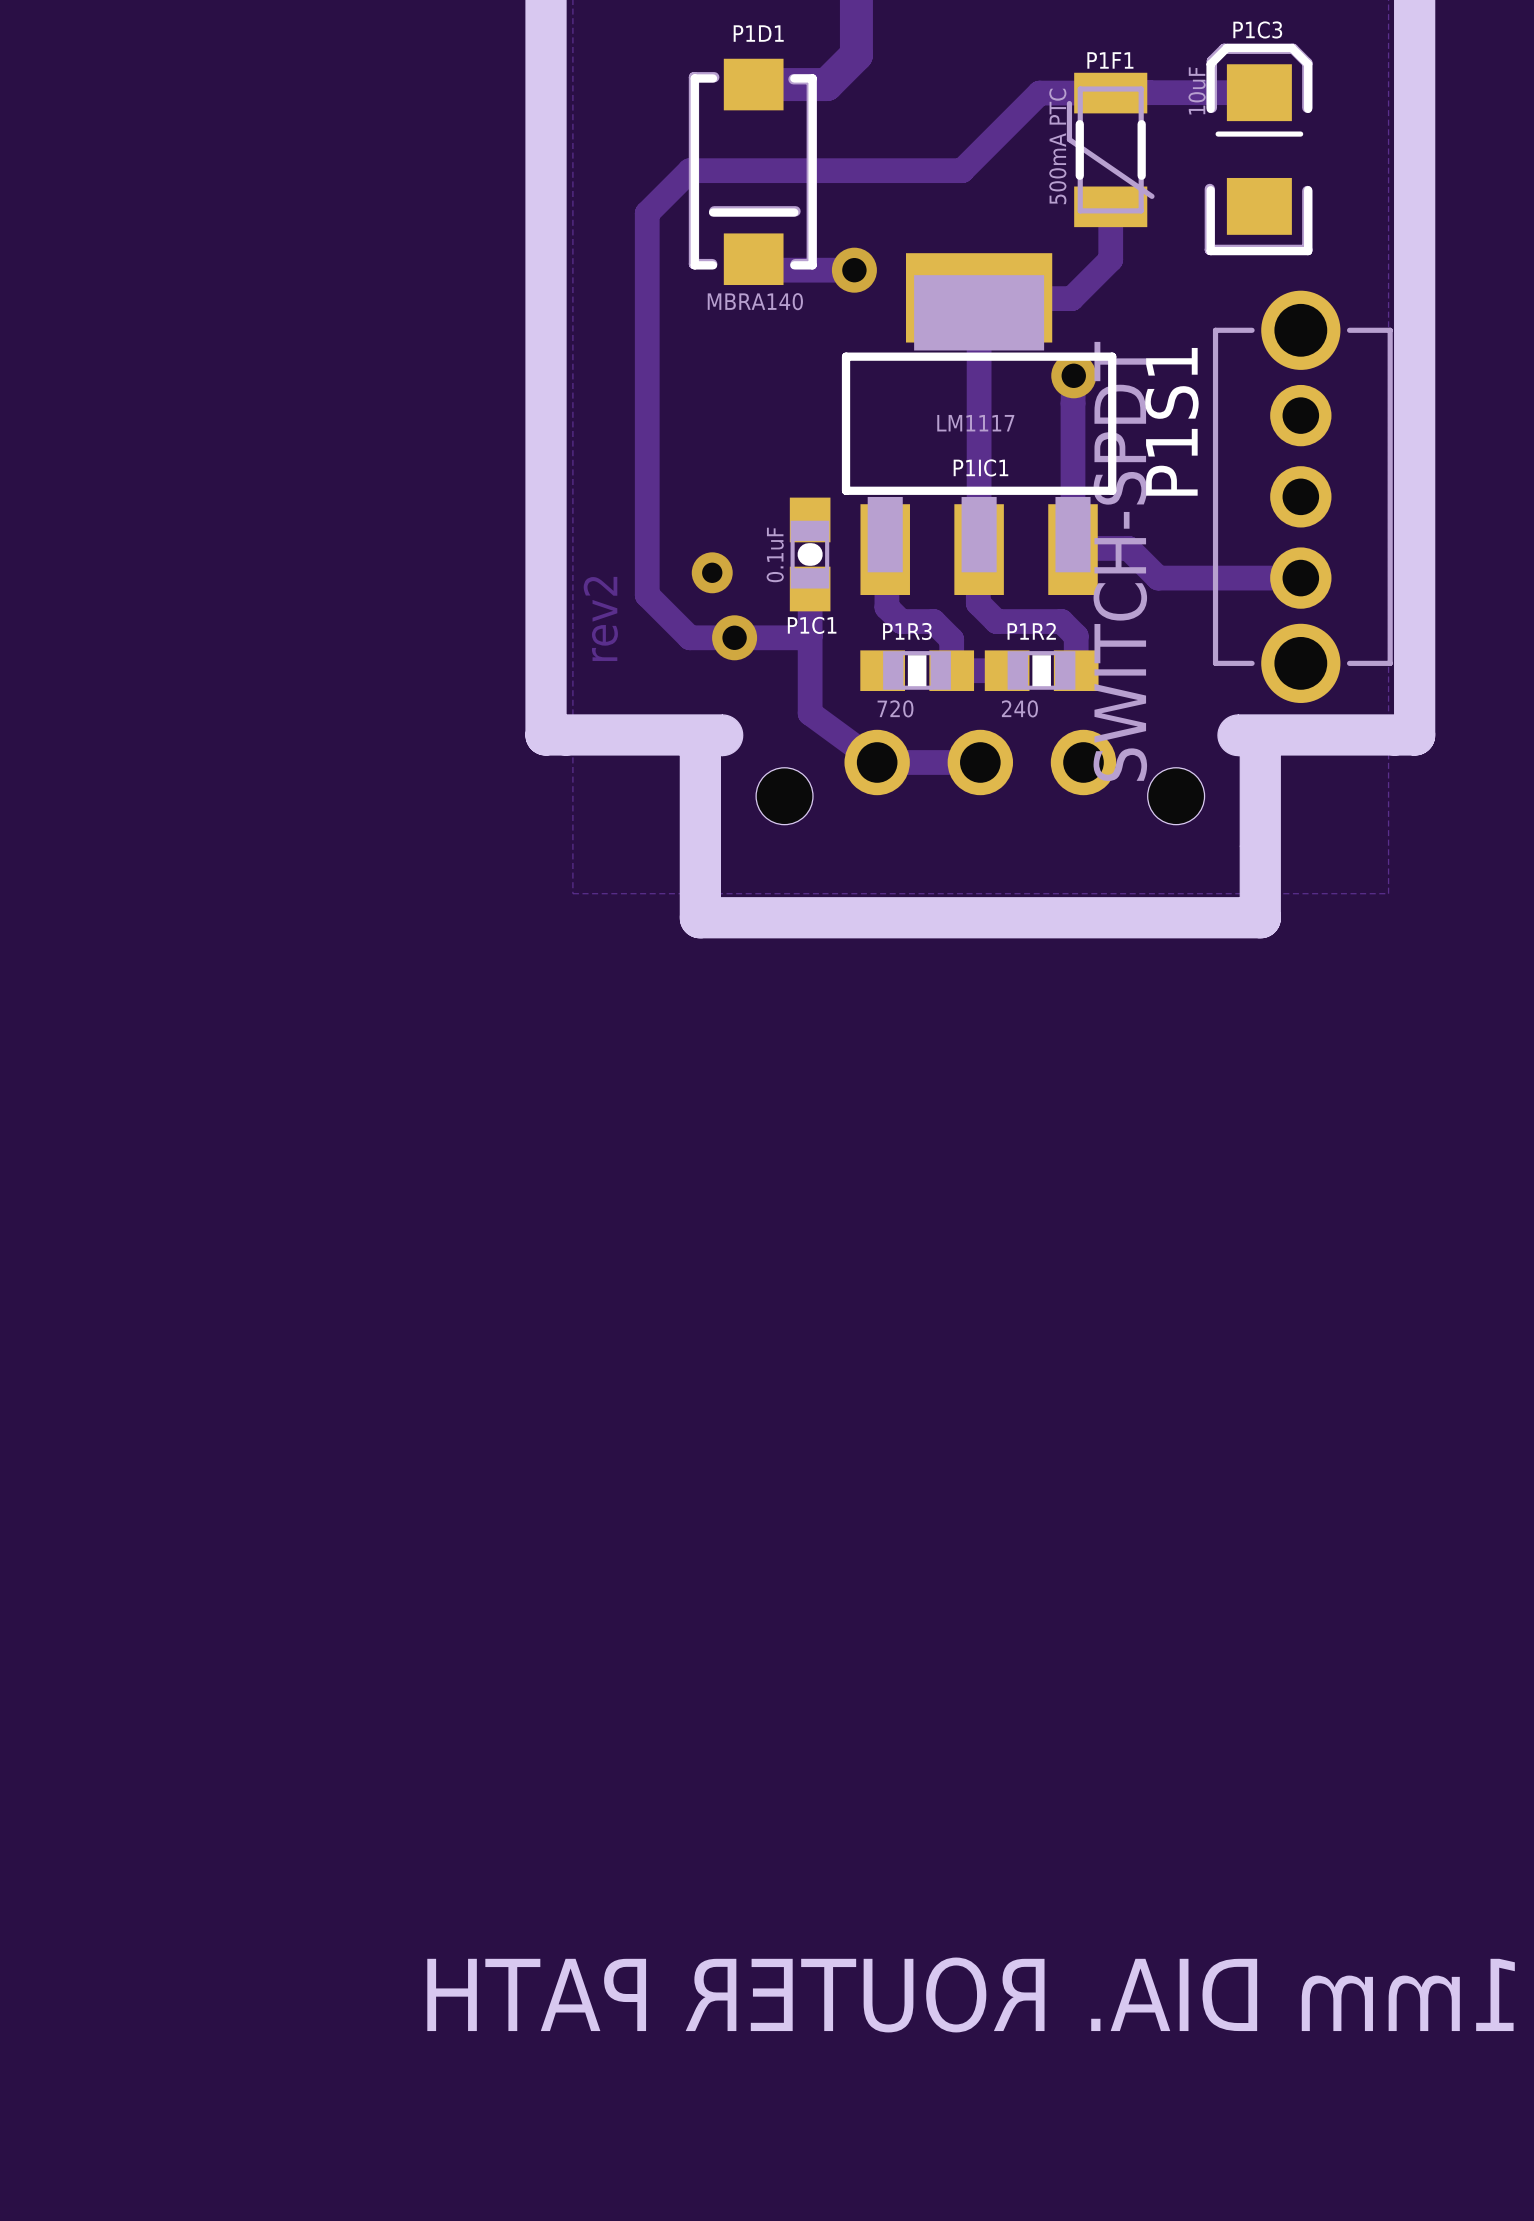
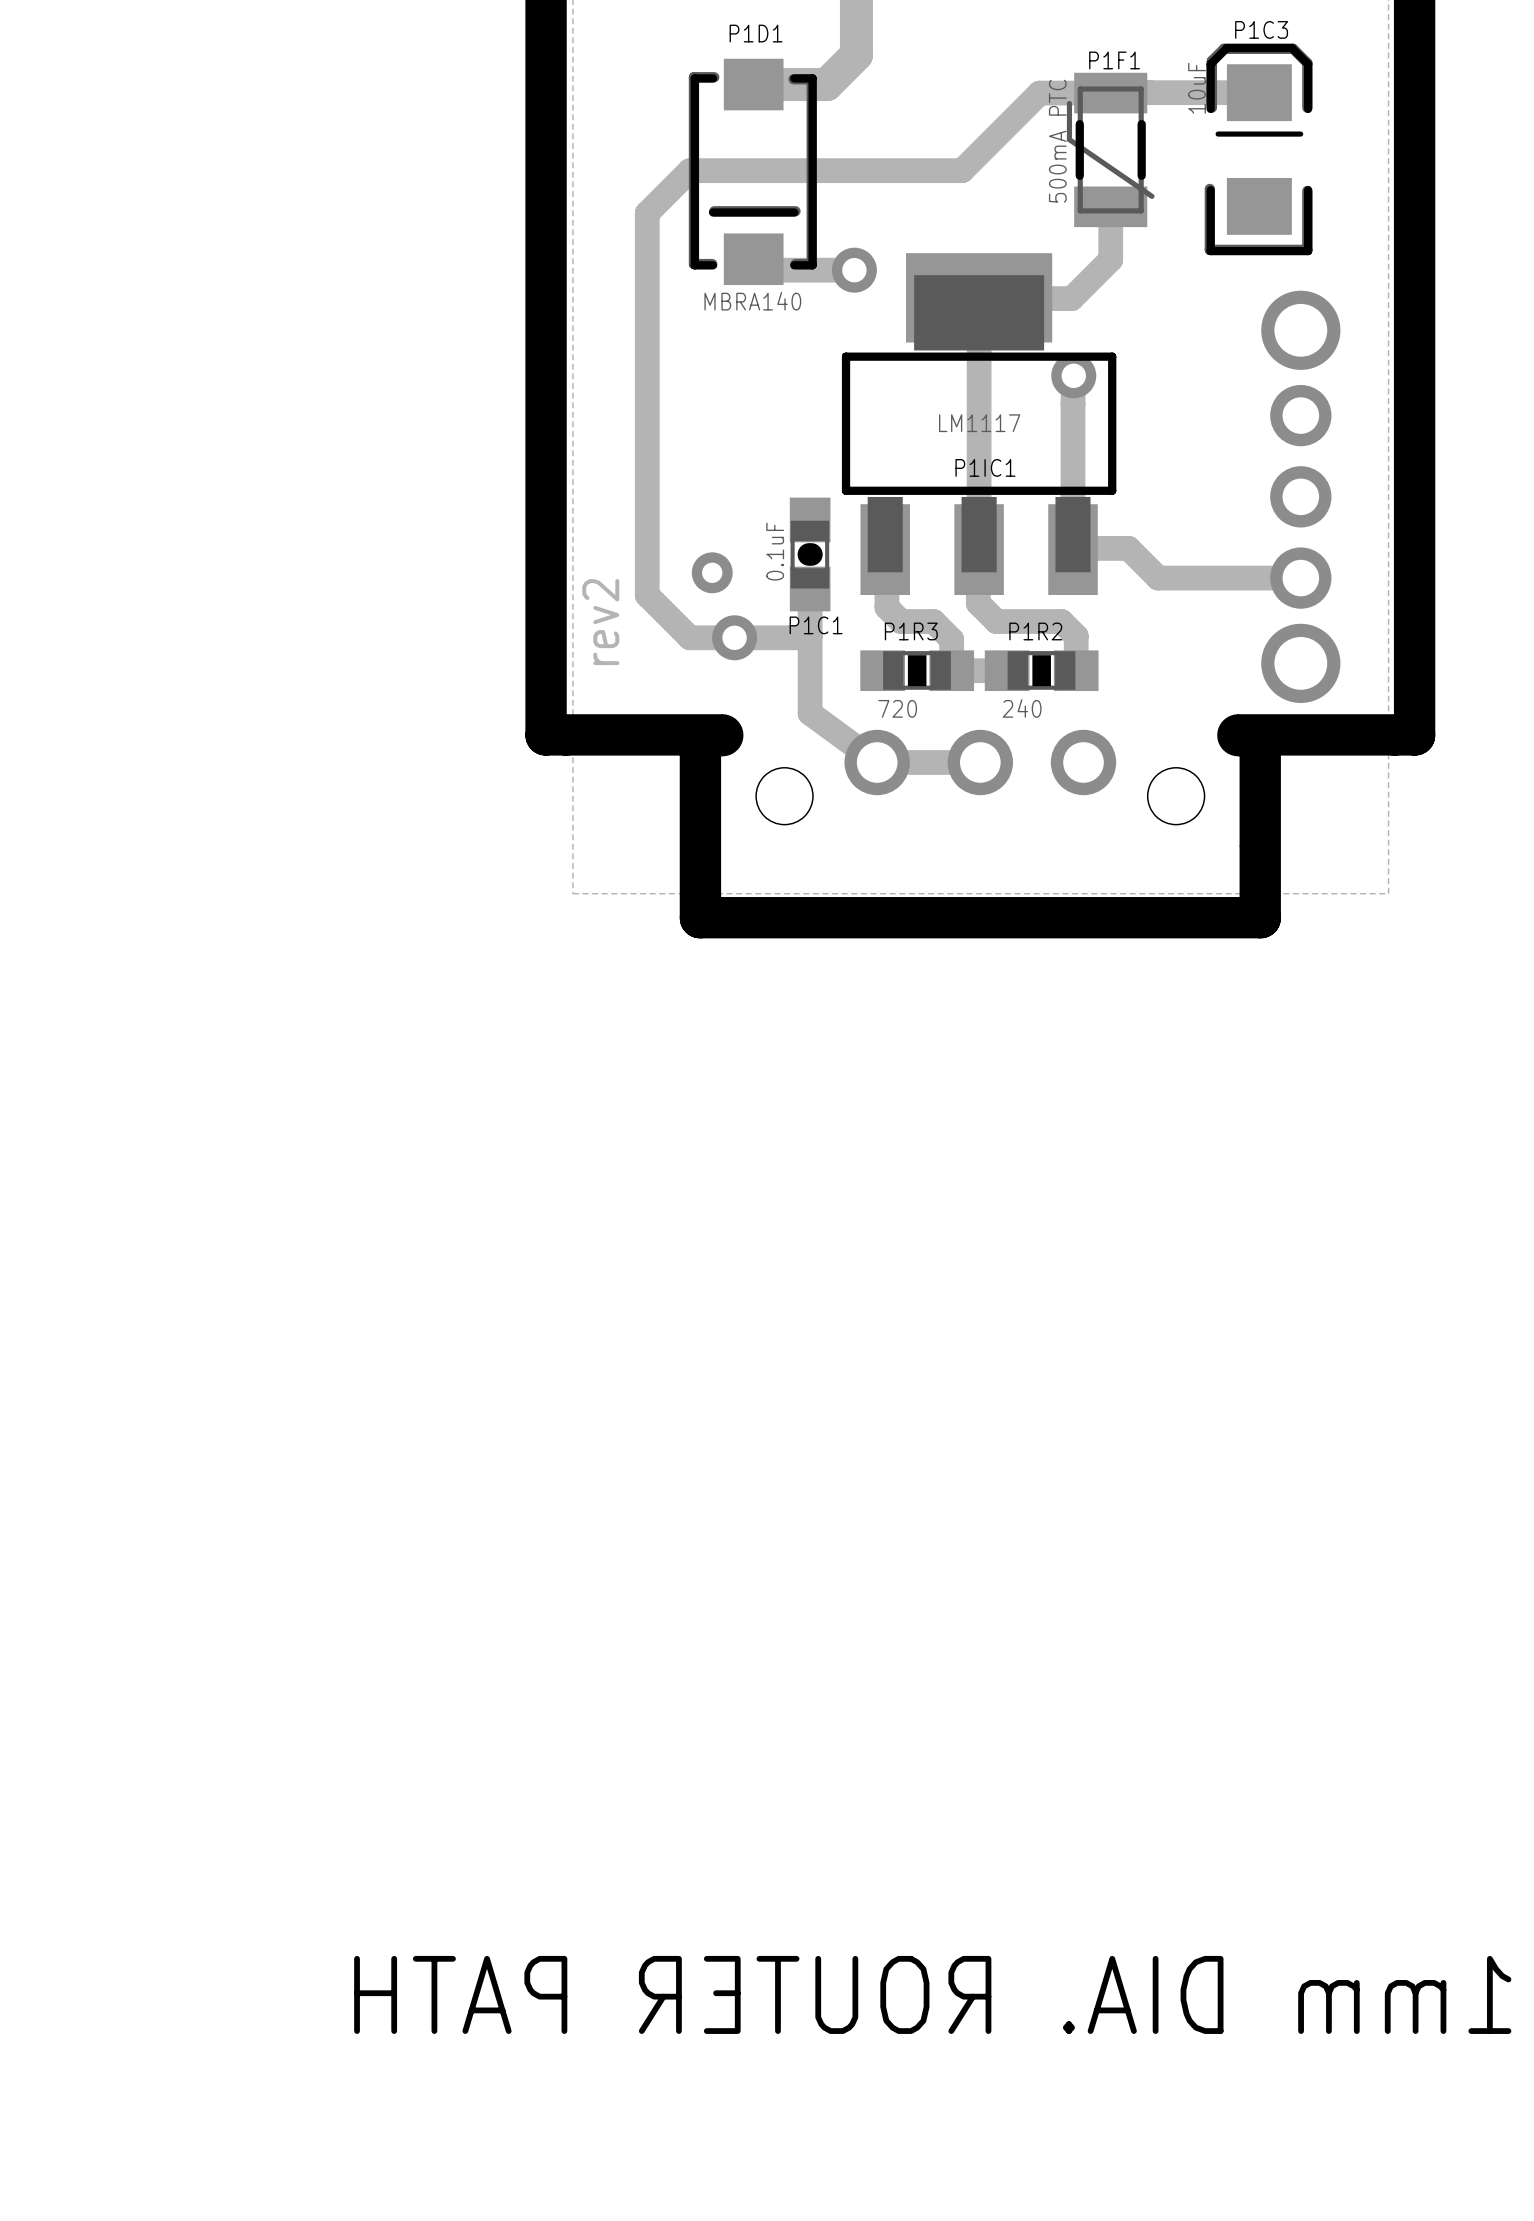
P1S1: SWITCH-SPDT (1302, 496) -> none

